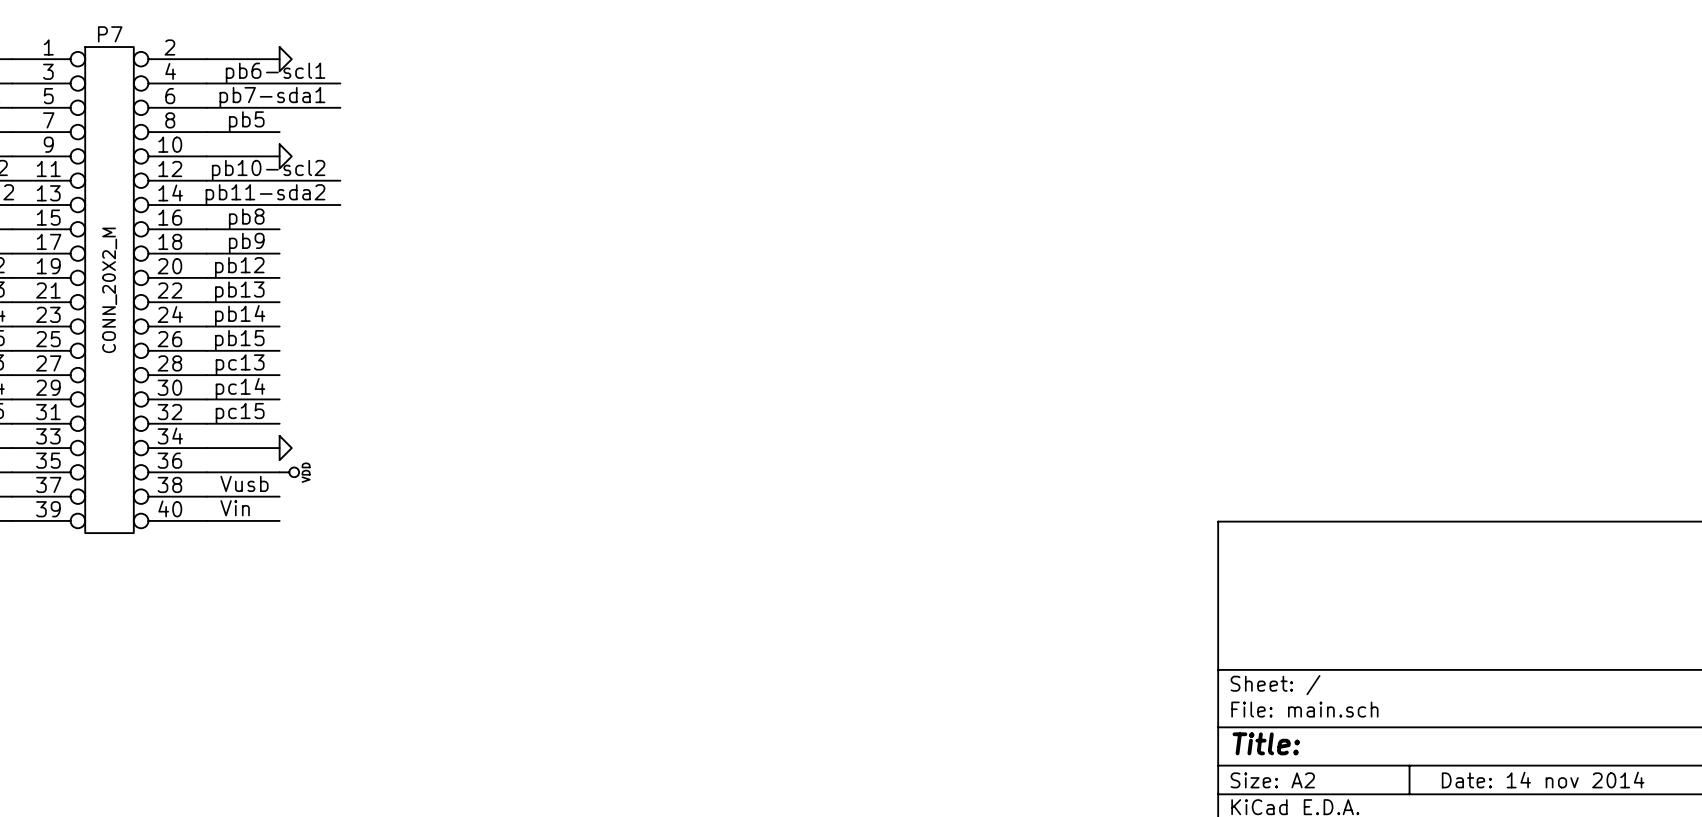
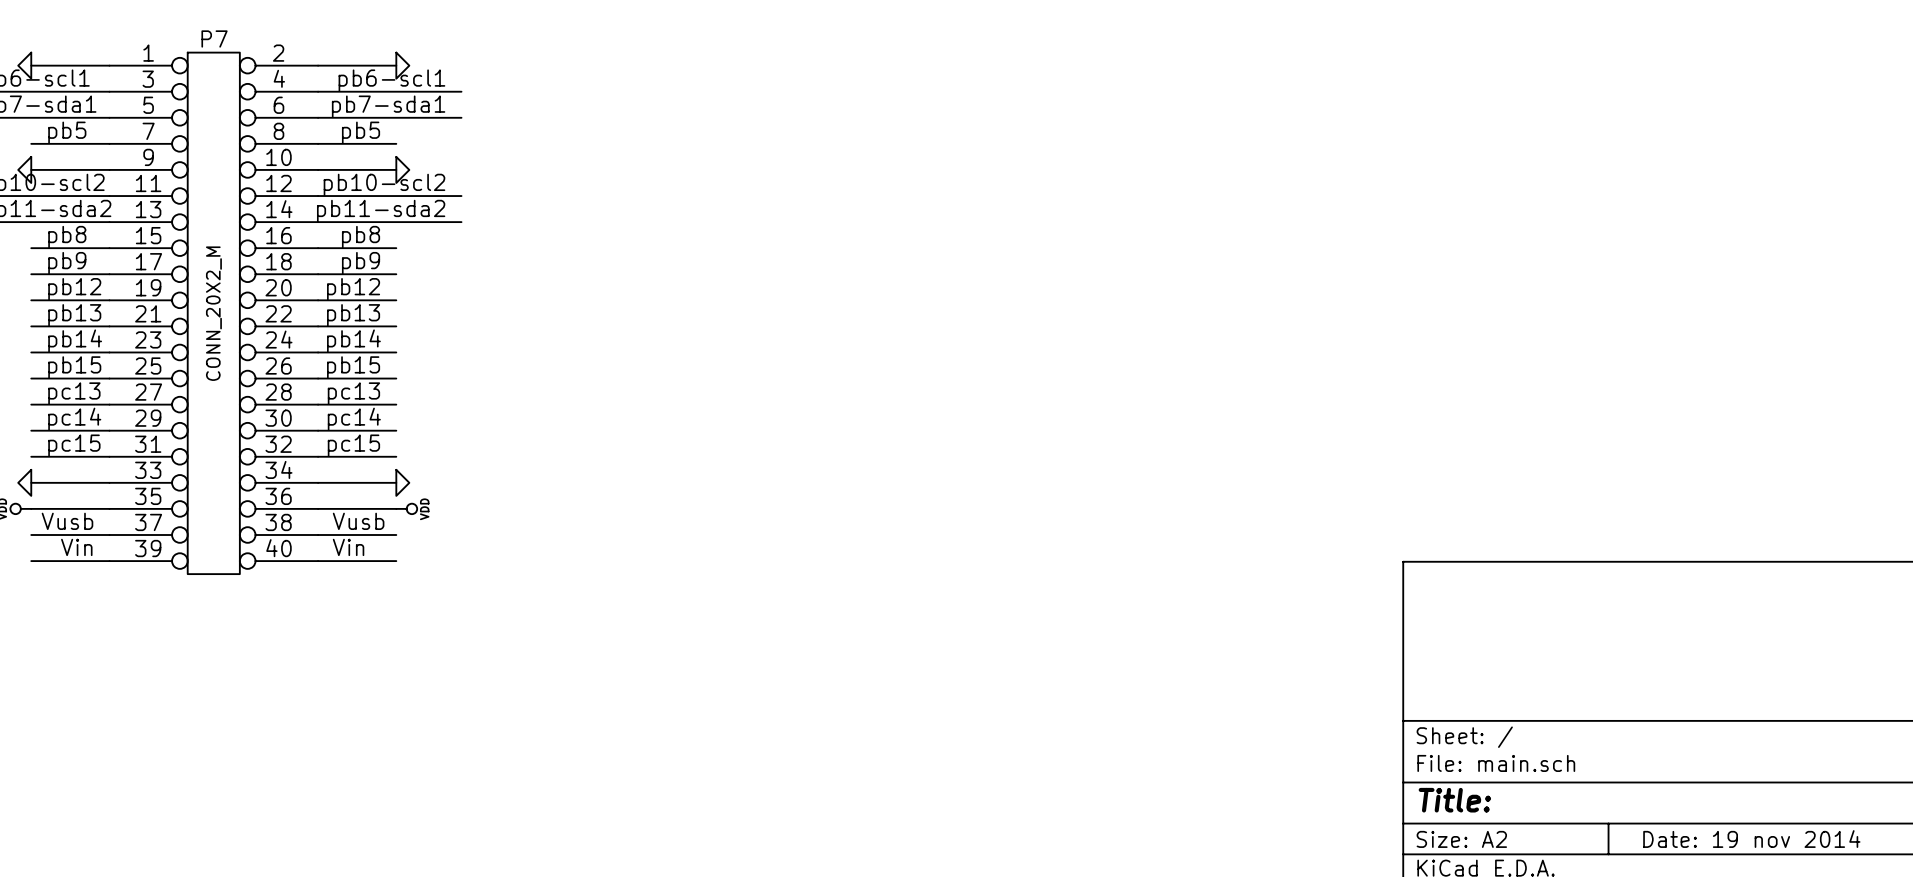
title block: Date: 14 nov 2014 (1543, 780) -> Date: 19 nov 2014 (1751, 839)

